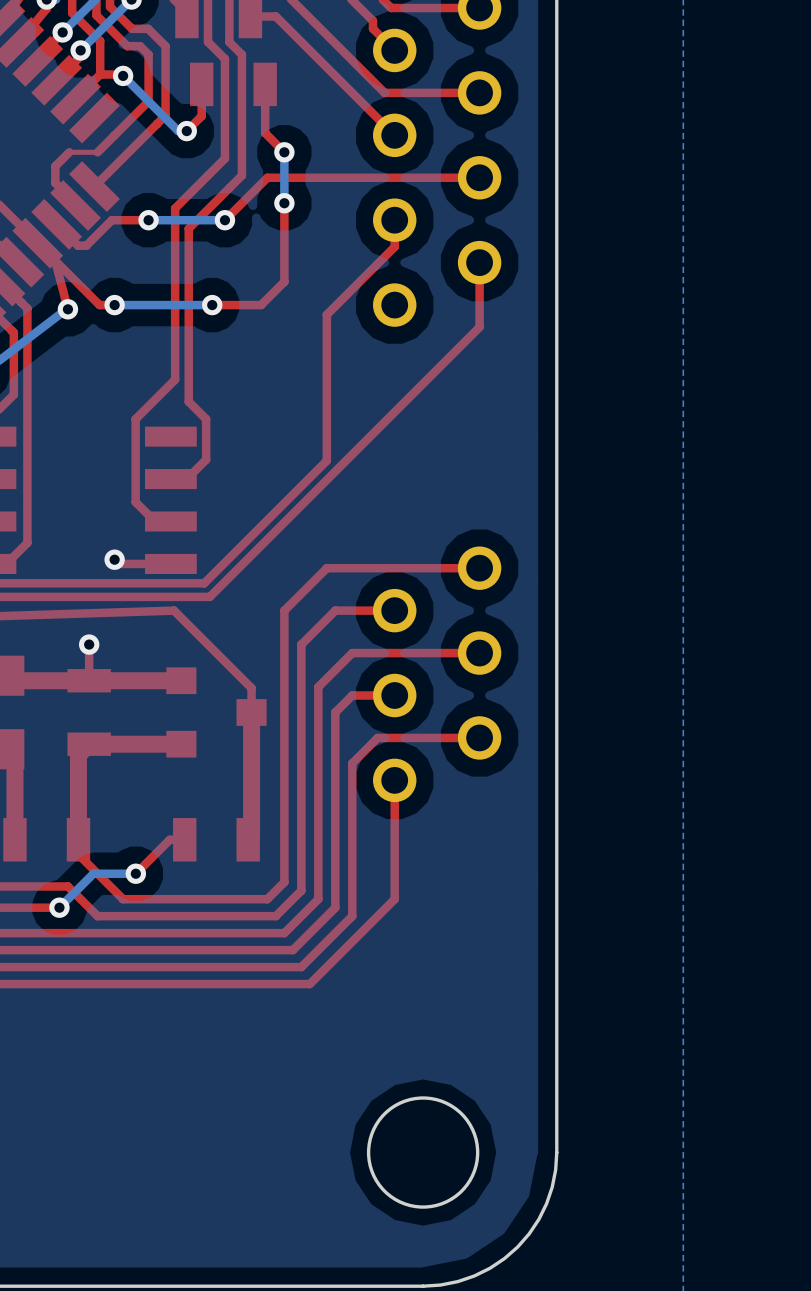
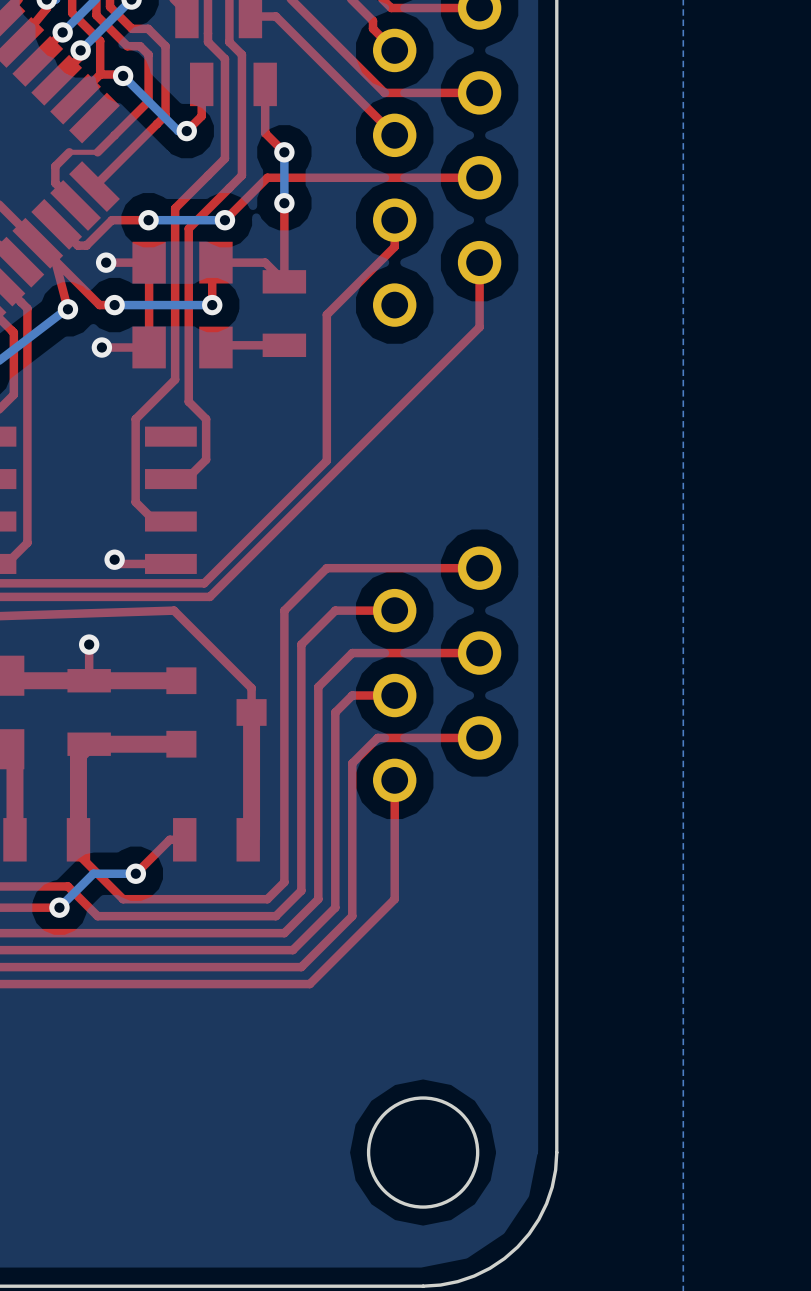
top track: none -> (106, 262) (149, 262) (149, 347) (101, 347)
via: none -> (106, 262)
part: none -> (182, 262)
top track: (284, 281) (261, 305) (212, 305) -> (284, 281) (265, 262) (215, 262) (212, 266) (212, 305)
part: none -> (284, 313)
top track: none -> (284, 345) (218, 345) (215, 347)
via: none -> (101, 347)
part: none -> (182, 347)

